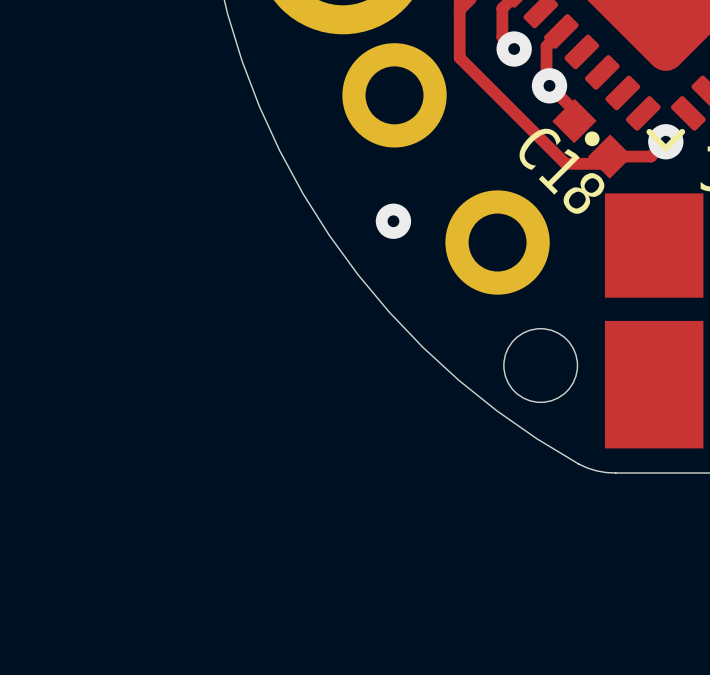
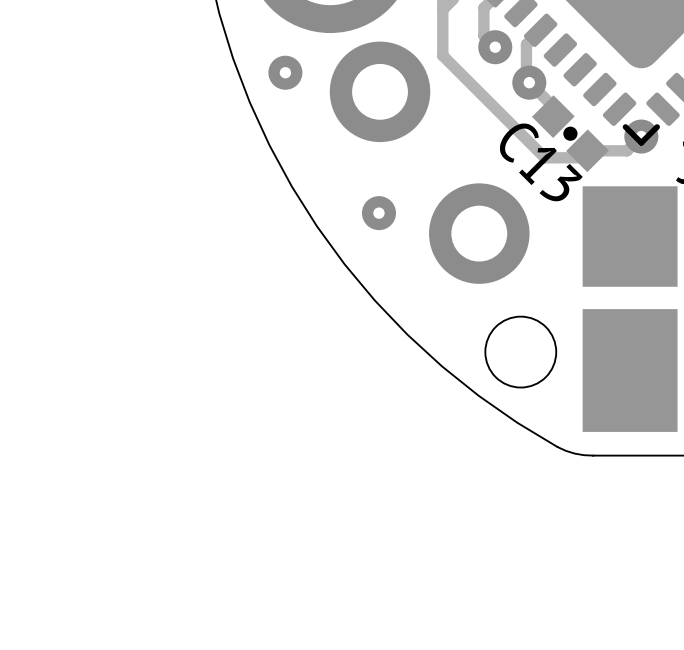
via: none -> (285, 72)
C18 name: C18 (561, 170) -> C13 (541, 162)

